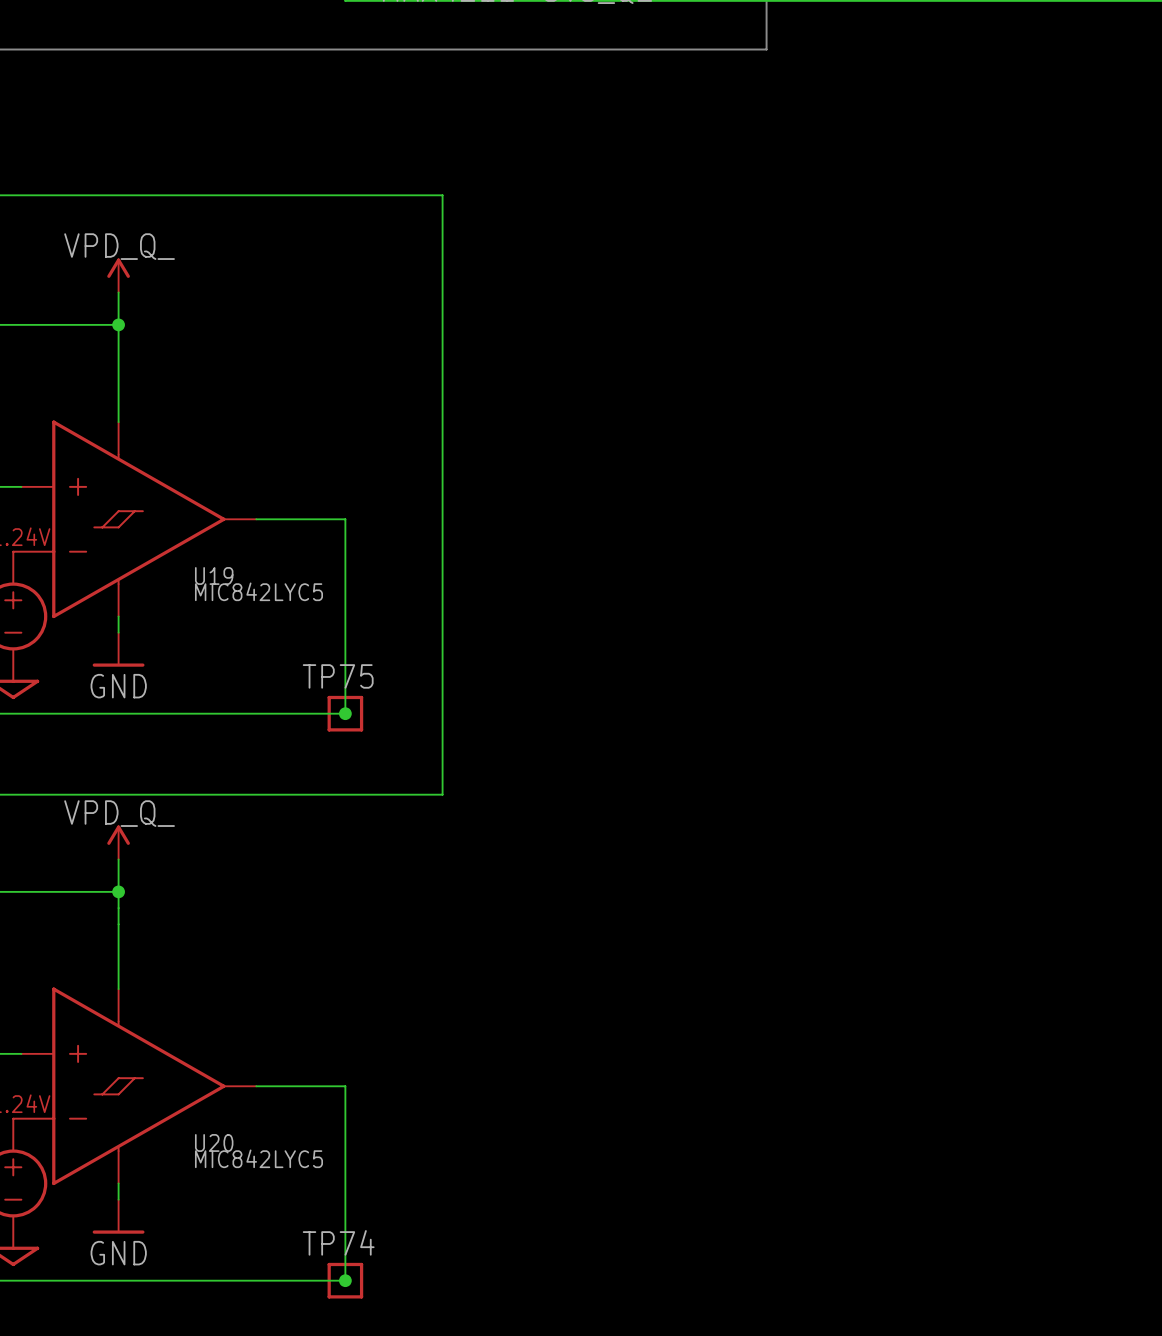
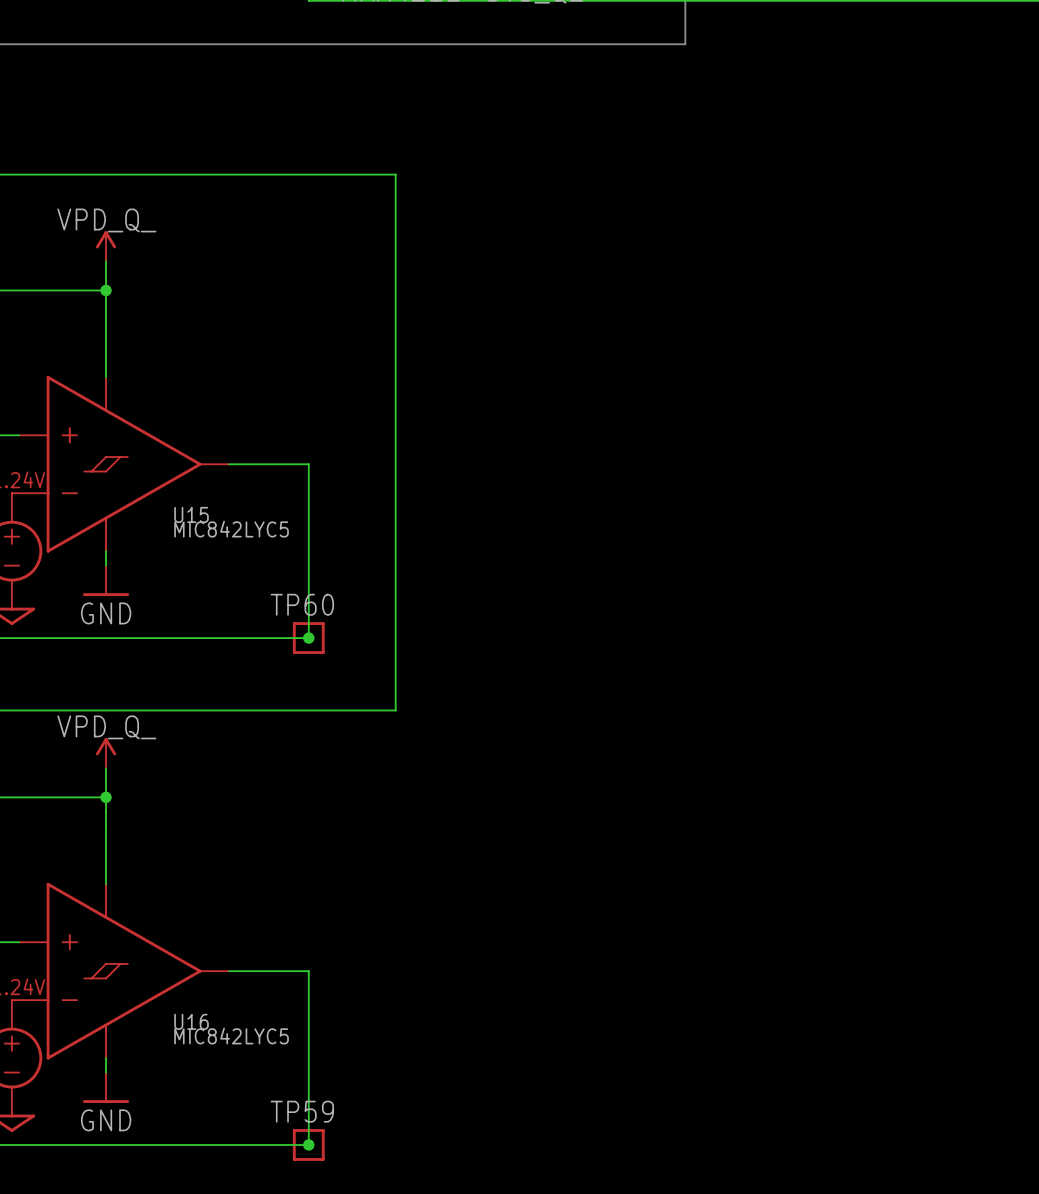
U19 name: U19 (214, 575) -> U15 (191, 514)
TP75 name: TP75 (338, 676) -> TP60 (302, 604)
U20 name: U20 (214, 1142) -> U16 (191, 1021)
TP74 name: TP74 (338, 1242) -> TP59 (302, 1111)

